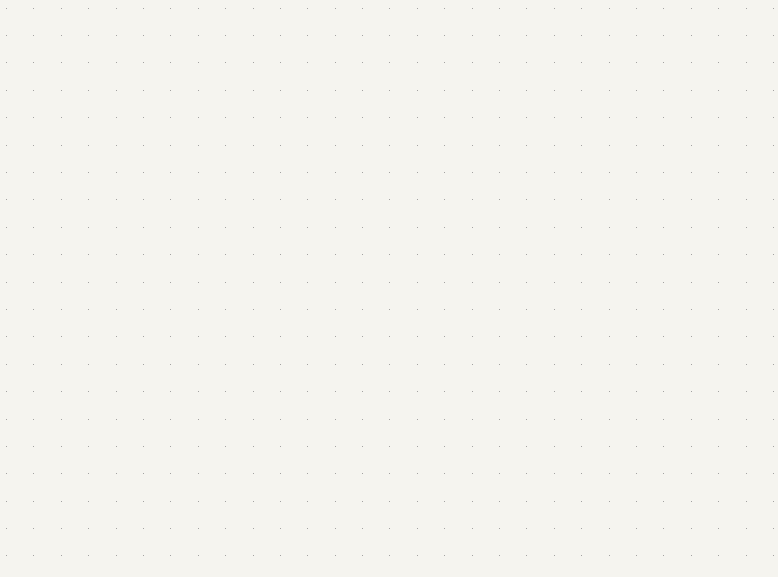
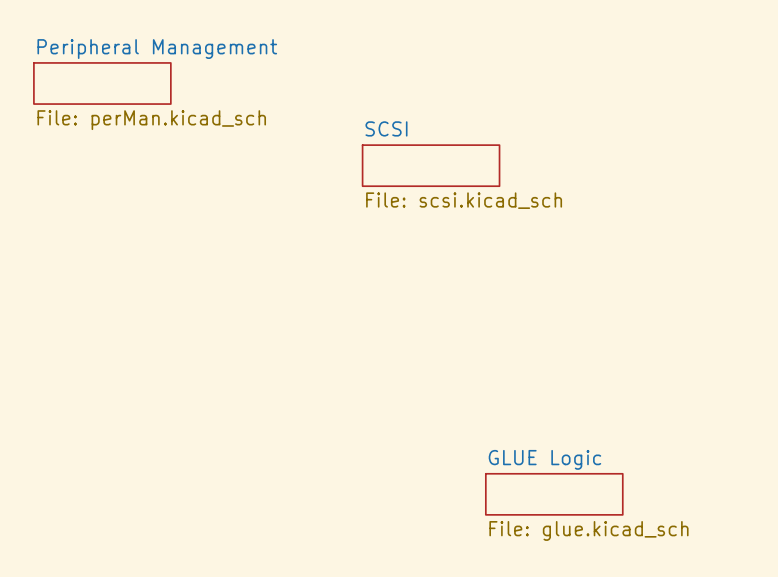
sheet Peripheral Management: none -> File: perMan.kicad_sch (102, 83)
sheet SCSI: none -> File: scsi.kicad_sch (431, 165)
sheet GLUE Logic: none -> File: glue.kicad_sch (554, 494)

